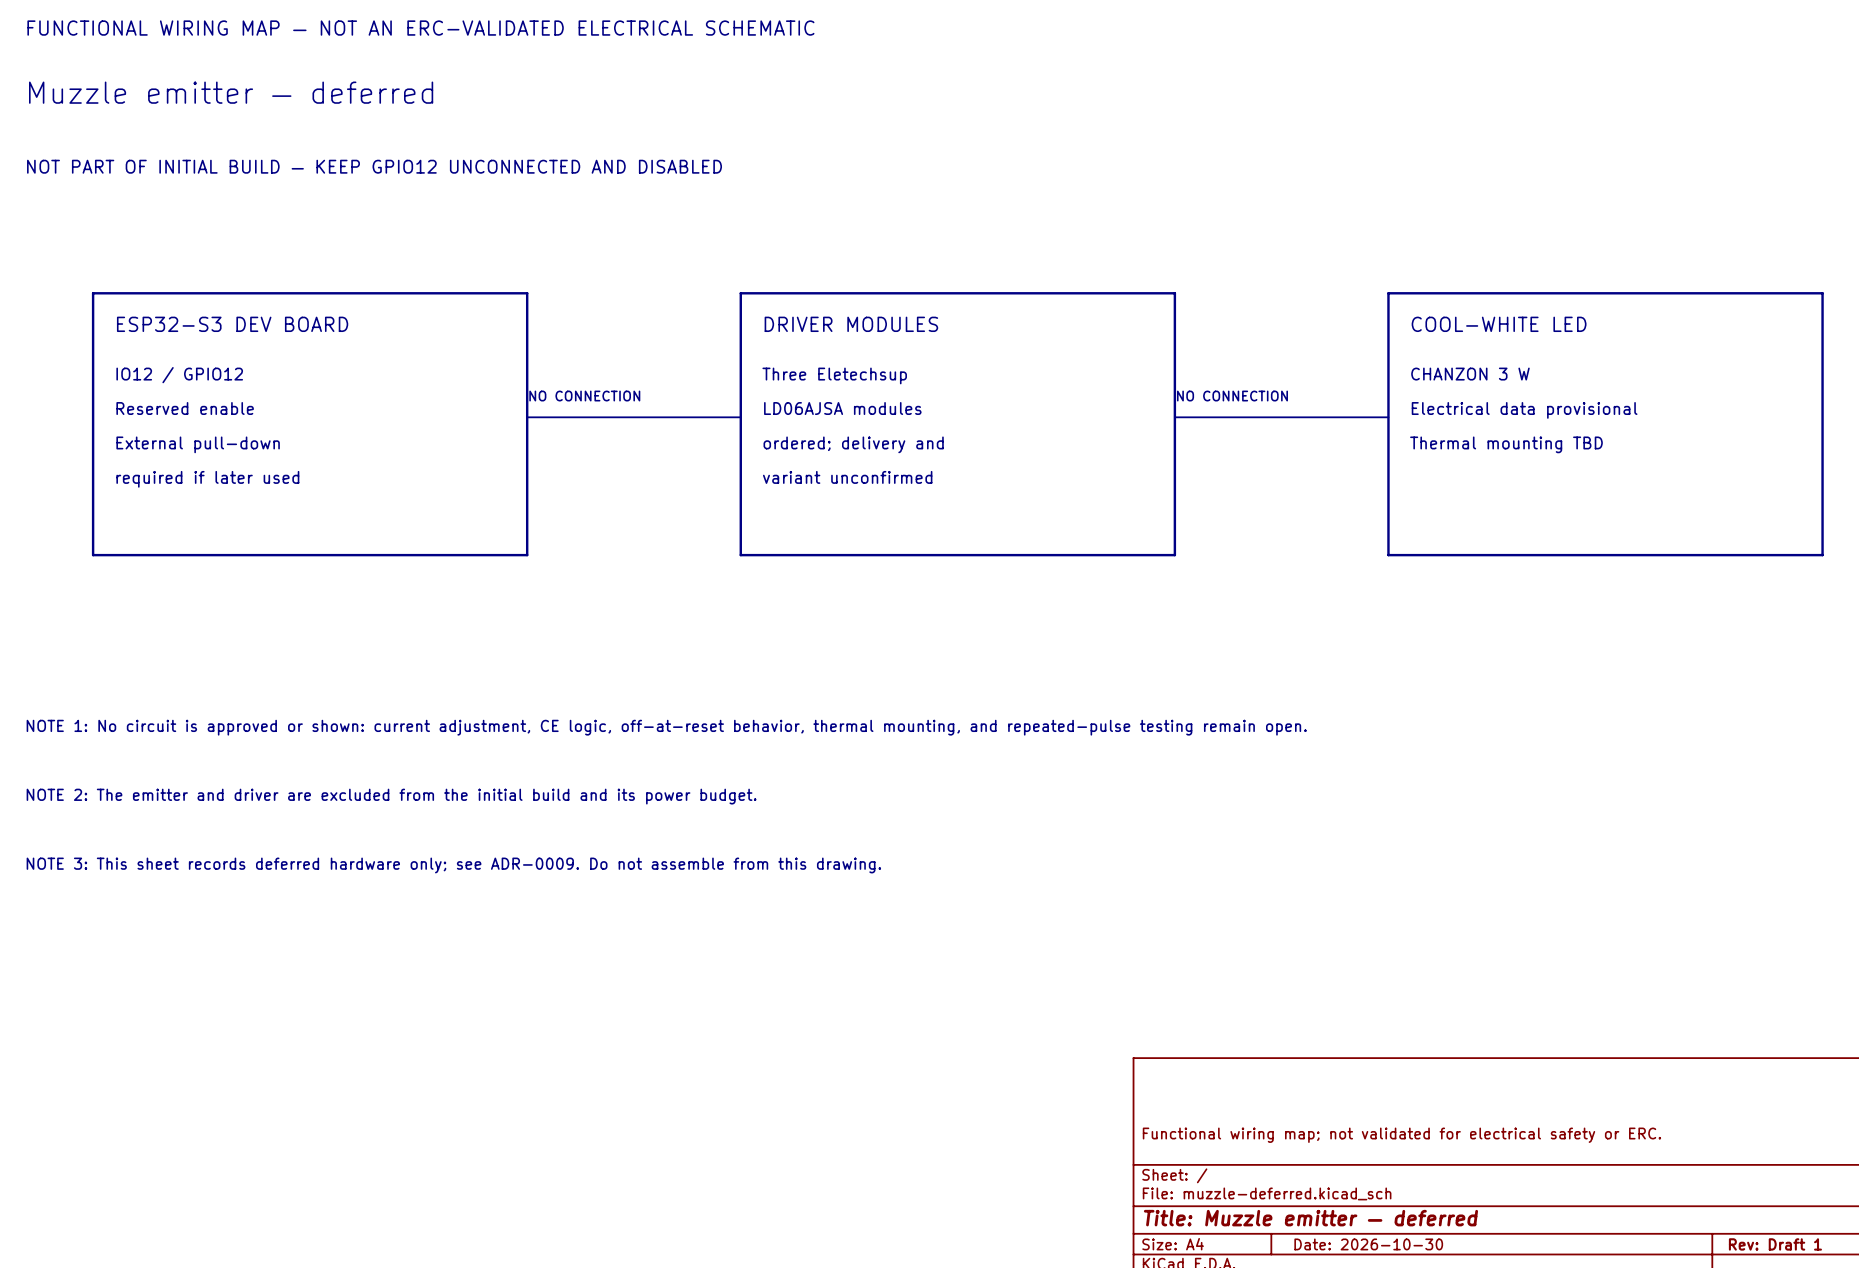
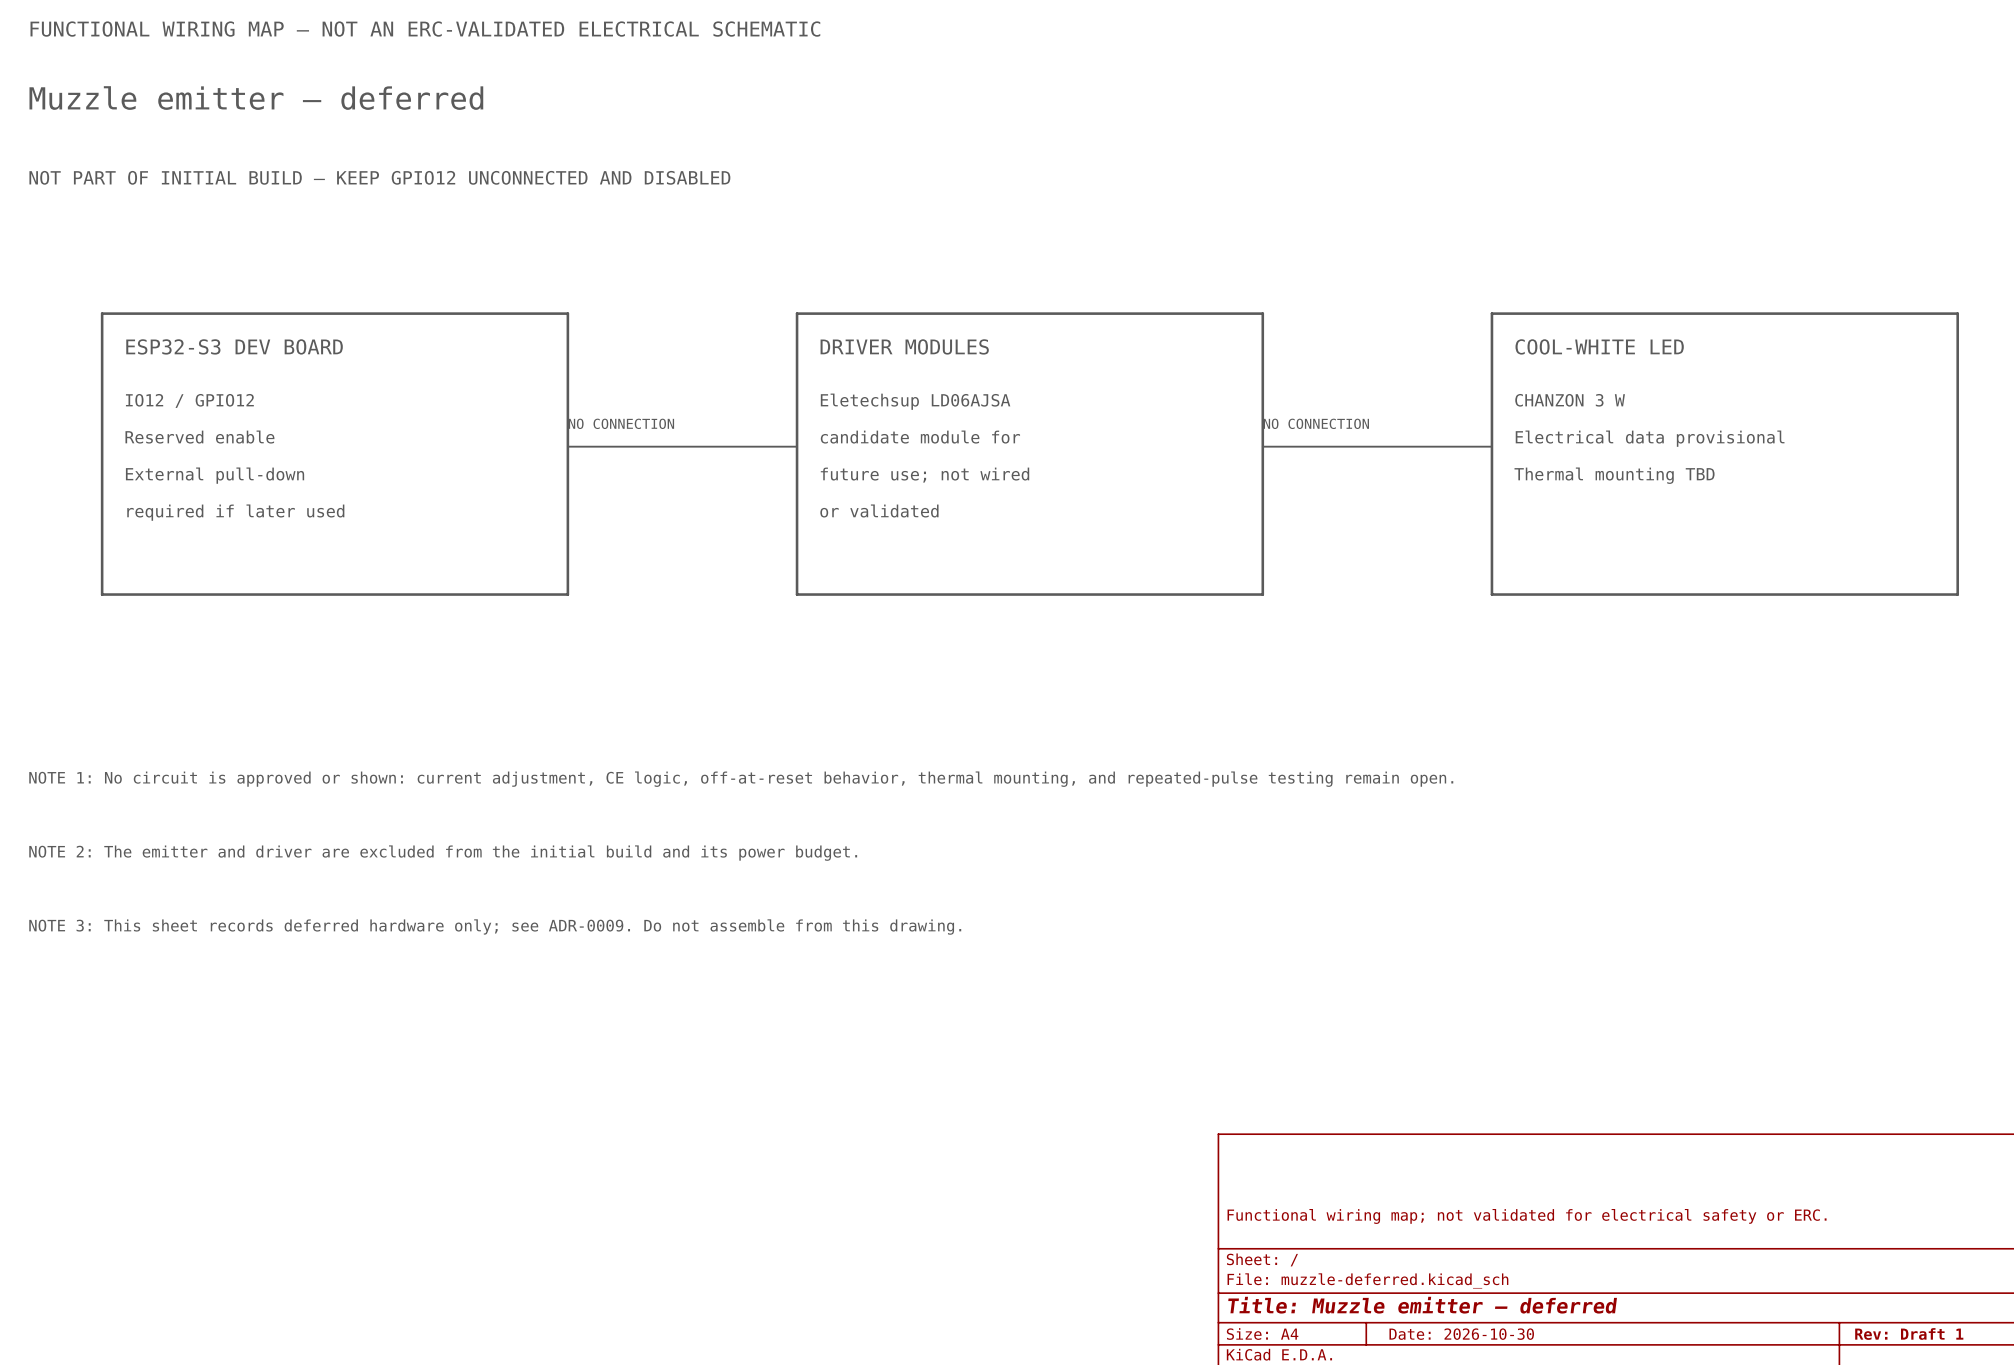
text: Three Eletechsup (834, 375) -> Eletechsup LD06AJSA (915, 401)
text: LD06AJSA modules (842, 408) -> candidate module for (920, 437)
text: ordered; delivery and (853, 444) -> future use; not wired (925, 475)
text: variant unconfirmed (847, 477) -> or validated (879, 510)

